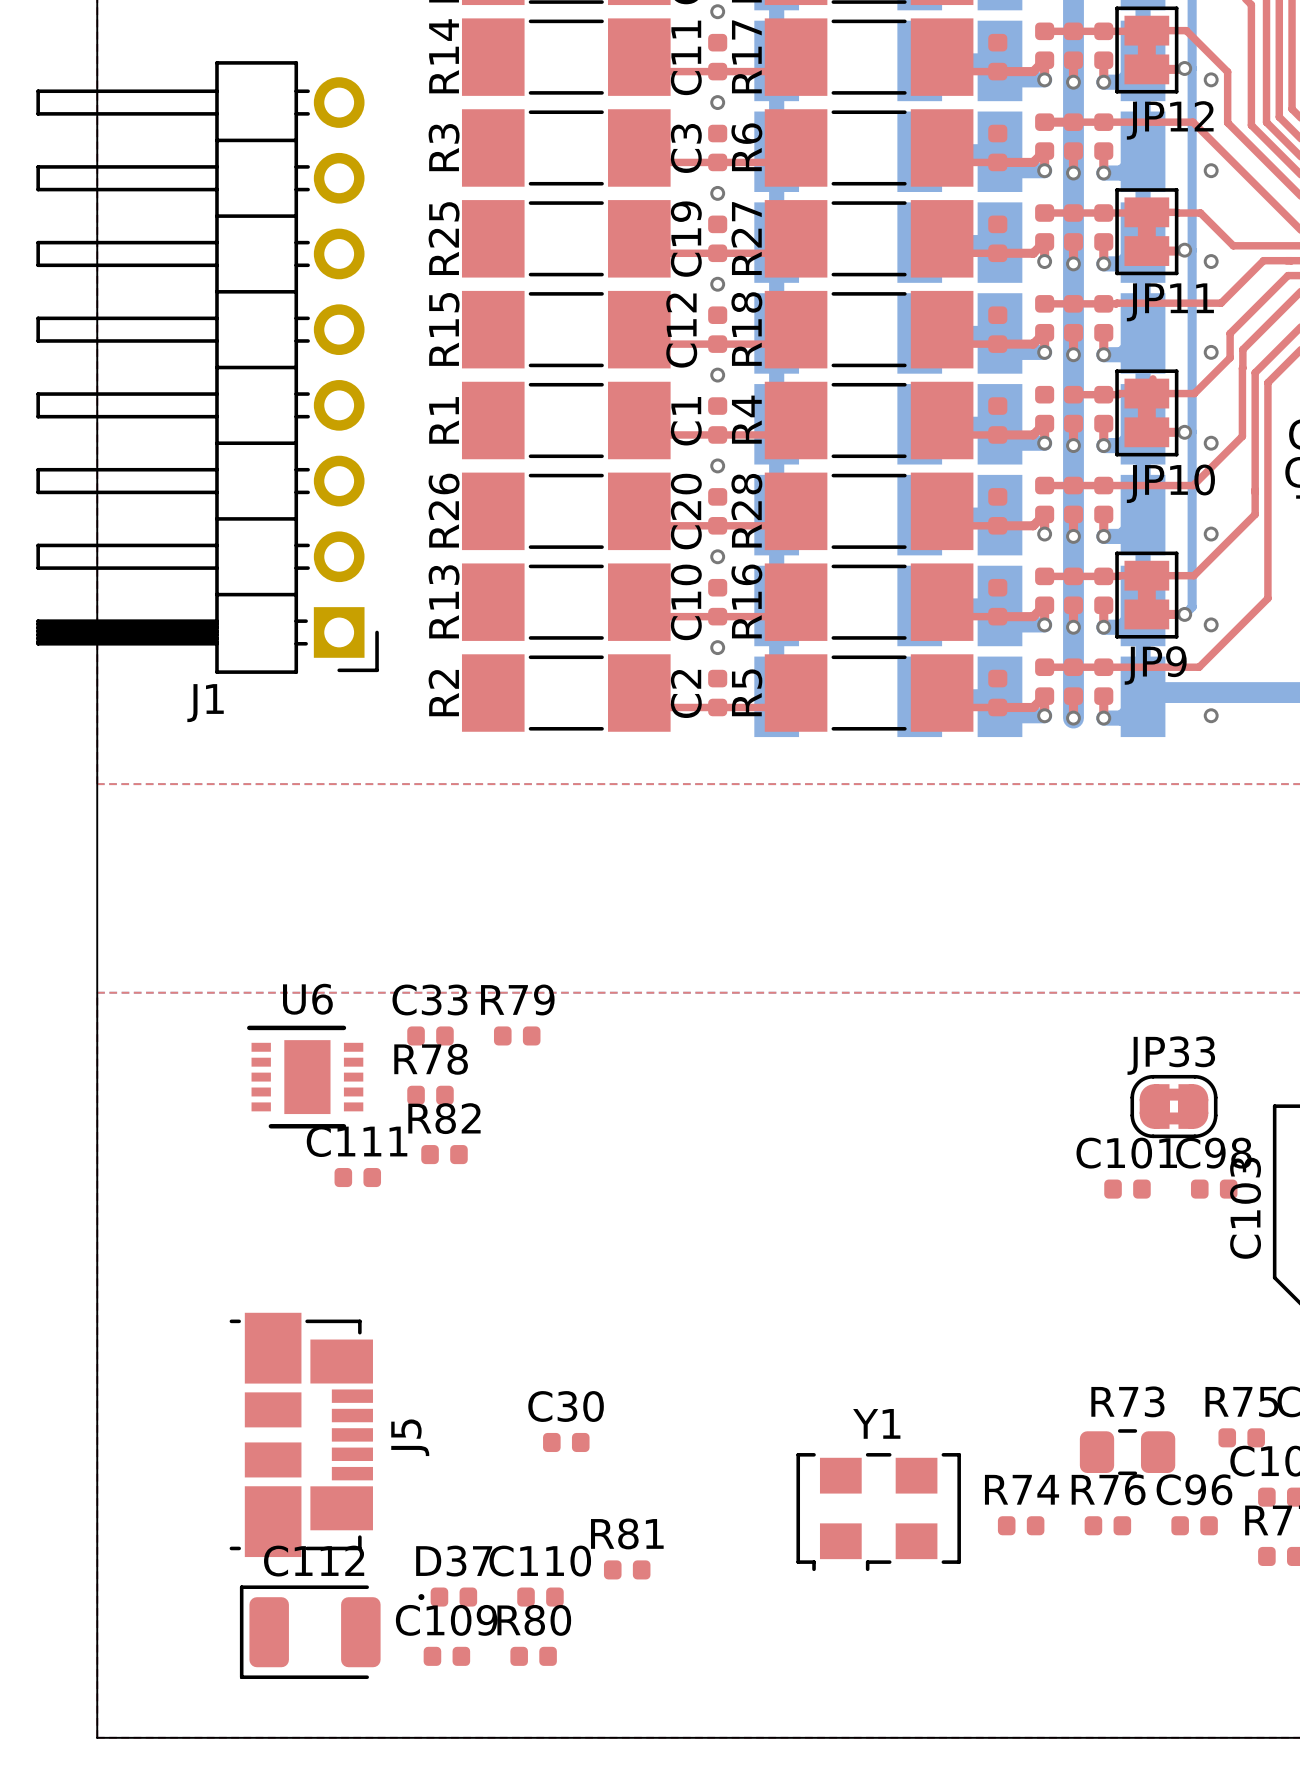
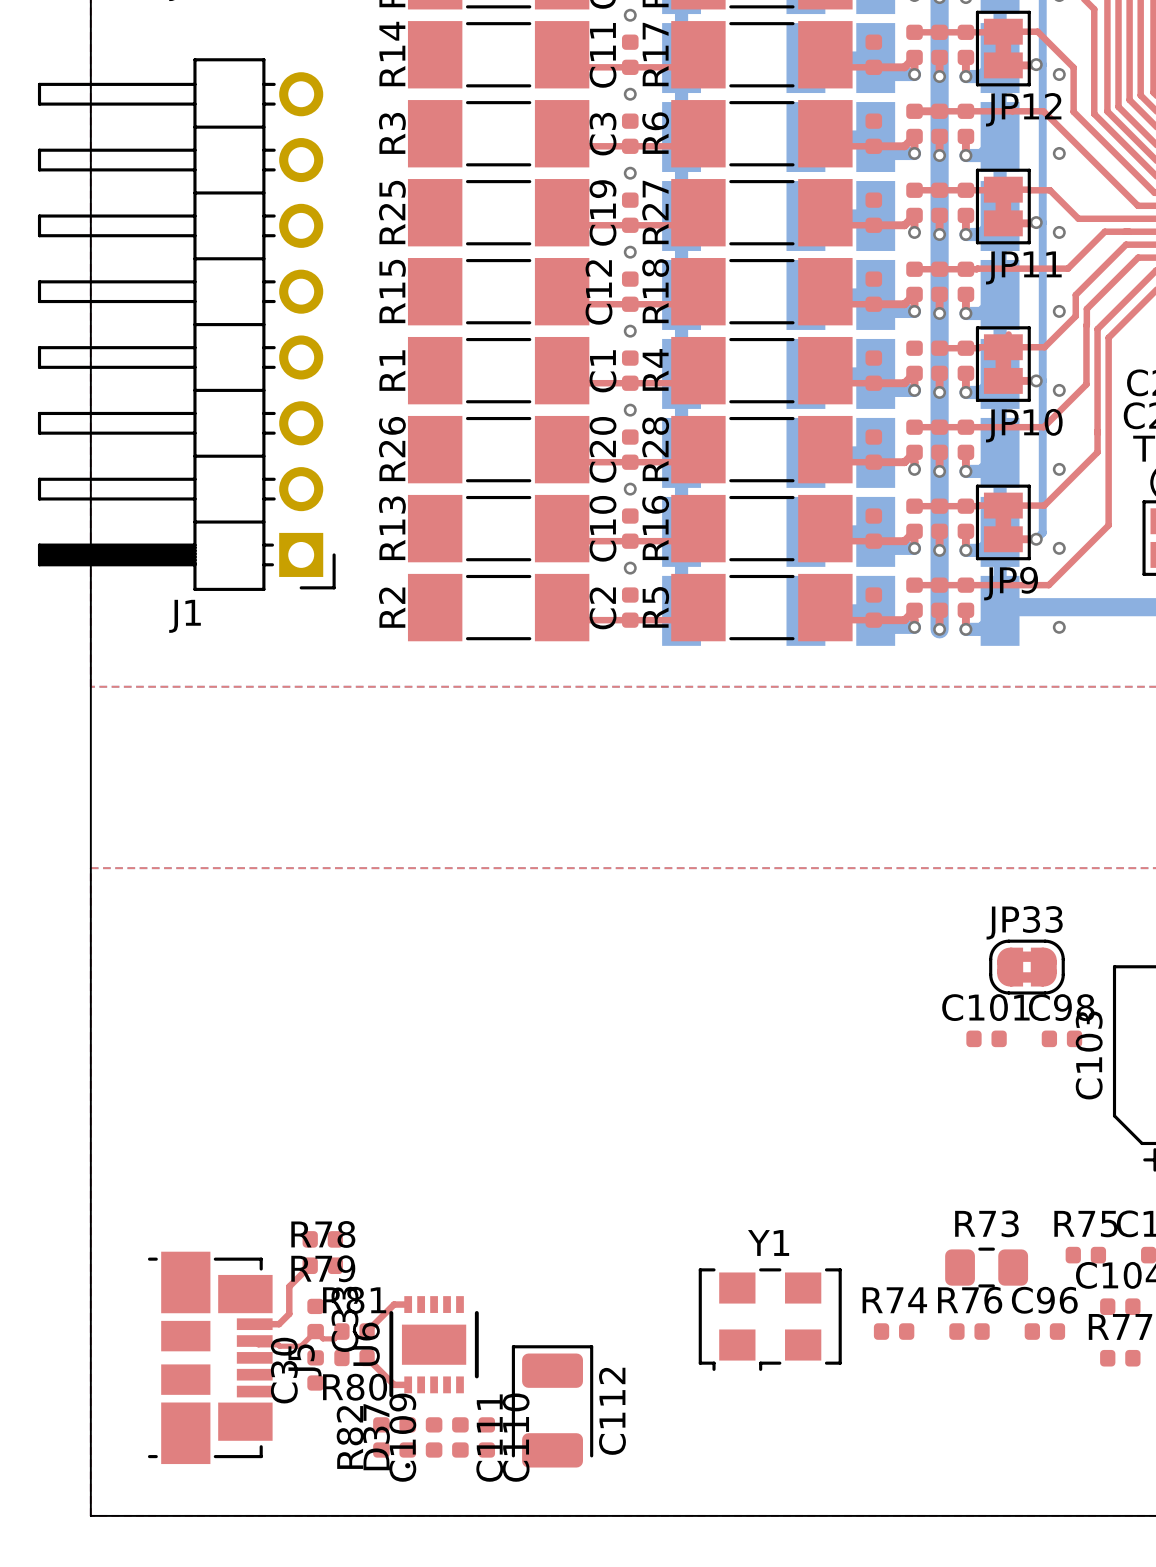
R79 name position: R79 (517, 999) -> R79 (323, 1268)
C33 rotation: 0° (430, 1035) -> 90° clockwise (315, 1318)
C33 position: (430, 1035) -> (315, 1318)
R79 position: (517, 1035) -> (322, 1239)
U6 rotation: 0° (305, 1077) -> 90° counterclockwise (434, 1346)
U6 position: (305, 1077) -> (434, 1346)
R78 position: (430, 1095) -> (322, 1265)
R82 rotation: 0° (444, 1154) -> 90° clockwise (381, 1437)
R82 position: (444, 1154) -> (381, 1437)
C111 rotation: 0° (357, 1177) -> 90° clockwise (460, 1437)
C111 position: (357, 1177) -> (460, 1437)
J5 position: (301, 1434) -> (210, 1357)
C30 rotation: 0° (566, 1442) -> 90° clockwise (315, 1370)
C30 position: (566, 1442) -> (315, 1370)
top track: none -> (310, 1265) (289, 1286) (289, 1313) (279, 1324) (254, 1324)
top track: none -> (408, 1304) (394, 1304) (367, 1331)
top track: none -> (341, 1331) (334, 1338) (322, 1338) (315, 1331) (300, 1346) (258, 1344) (254, 1341)
top track: none -> (367, 1357) (394, 1384) (408, 1384)
R81 position: (627, 1569) -> (354, 1331)
D37 rotation: 0° (447, 1597) -> 90° counterclockwise (407, 1442)
D37 position: (447, 1597) -> (407, 1442)
C110 rotation: 0° (540, 1597) -> 90° clockwise (486, 1437)
C110 position: (540, 1597) -> (486, 1437)
R80 name position: R80 (534, 1620) -> R80 (355, 1387)
C112 rotation: 0° (310, 1632) -> 90° clockwise (552, 1406)
C112 position: (310, 1632) -> (552, 1406)
C109 rotation: 0° (446, 1656) -> 90° clockwise (434, 1437)
C109 position: (446, 1656) -> (434, 1437)
R80 position: (533, 1656) -> (354, 1357)

